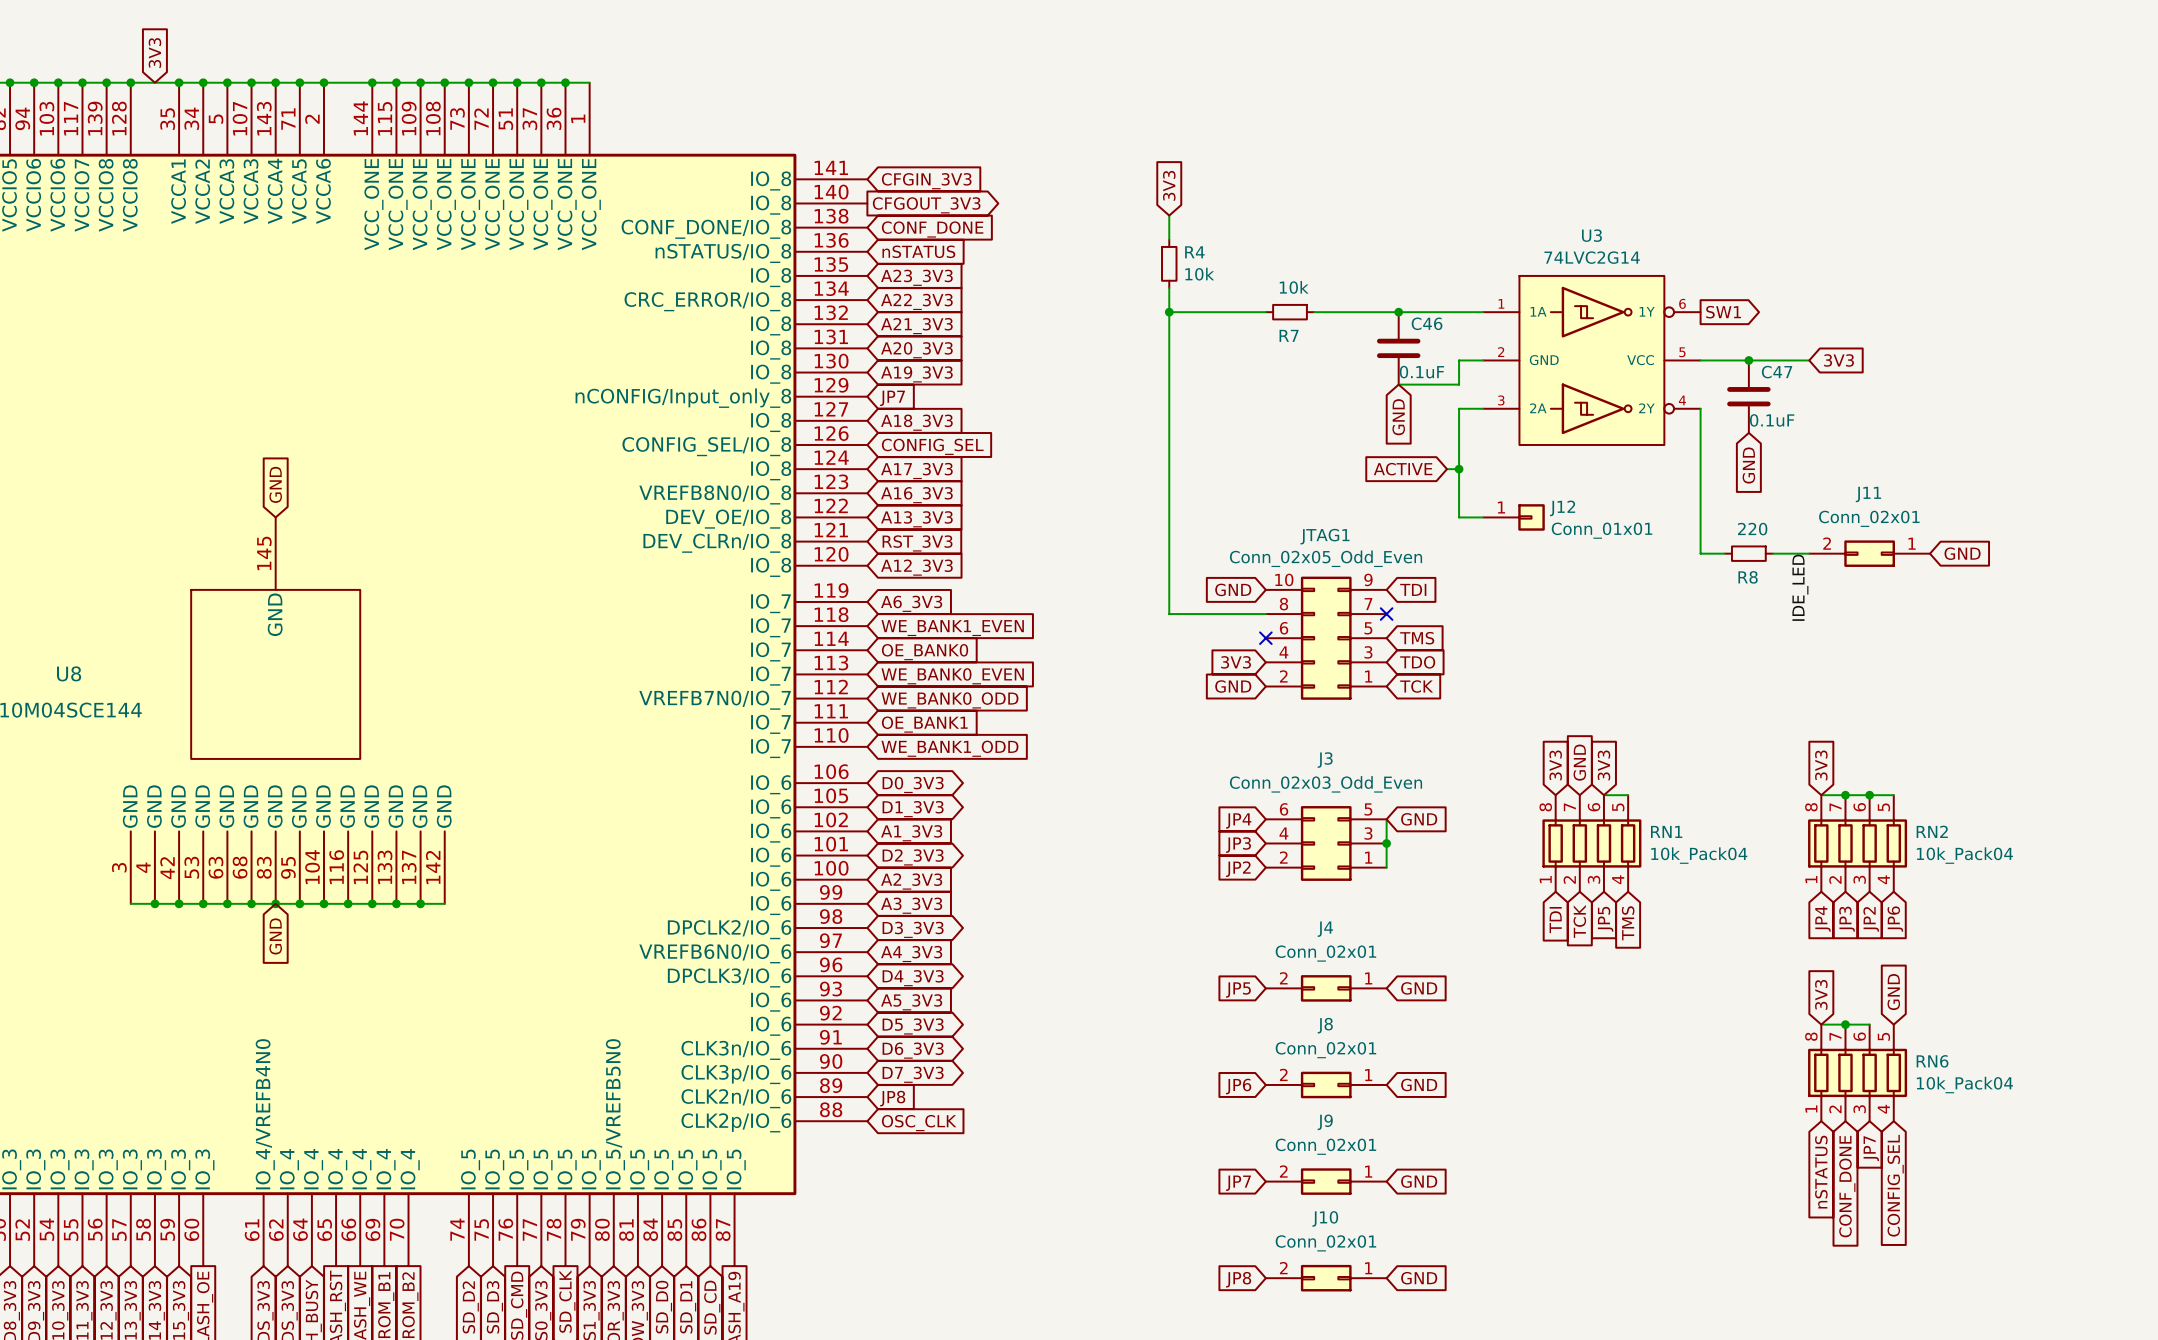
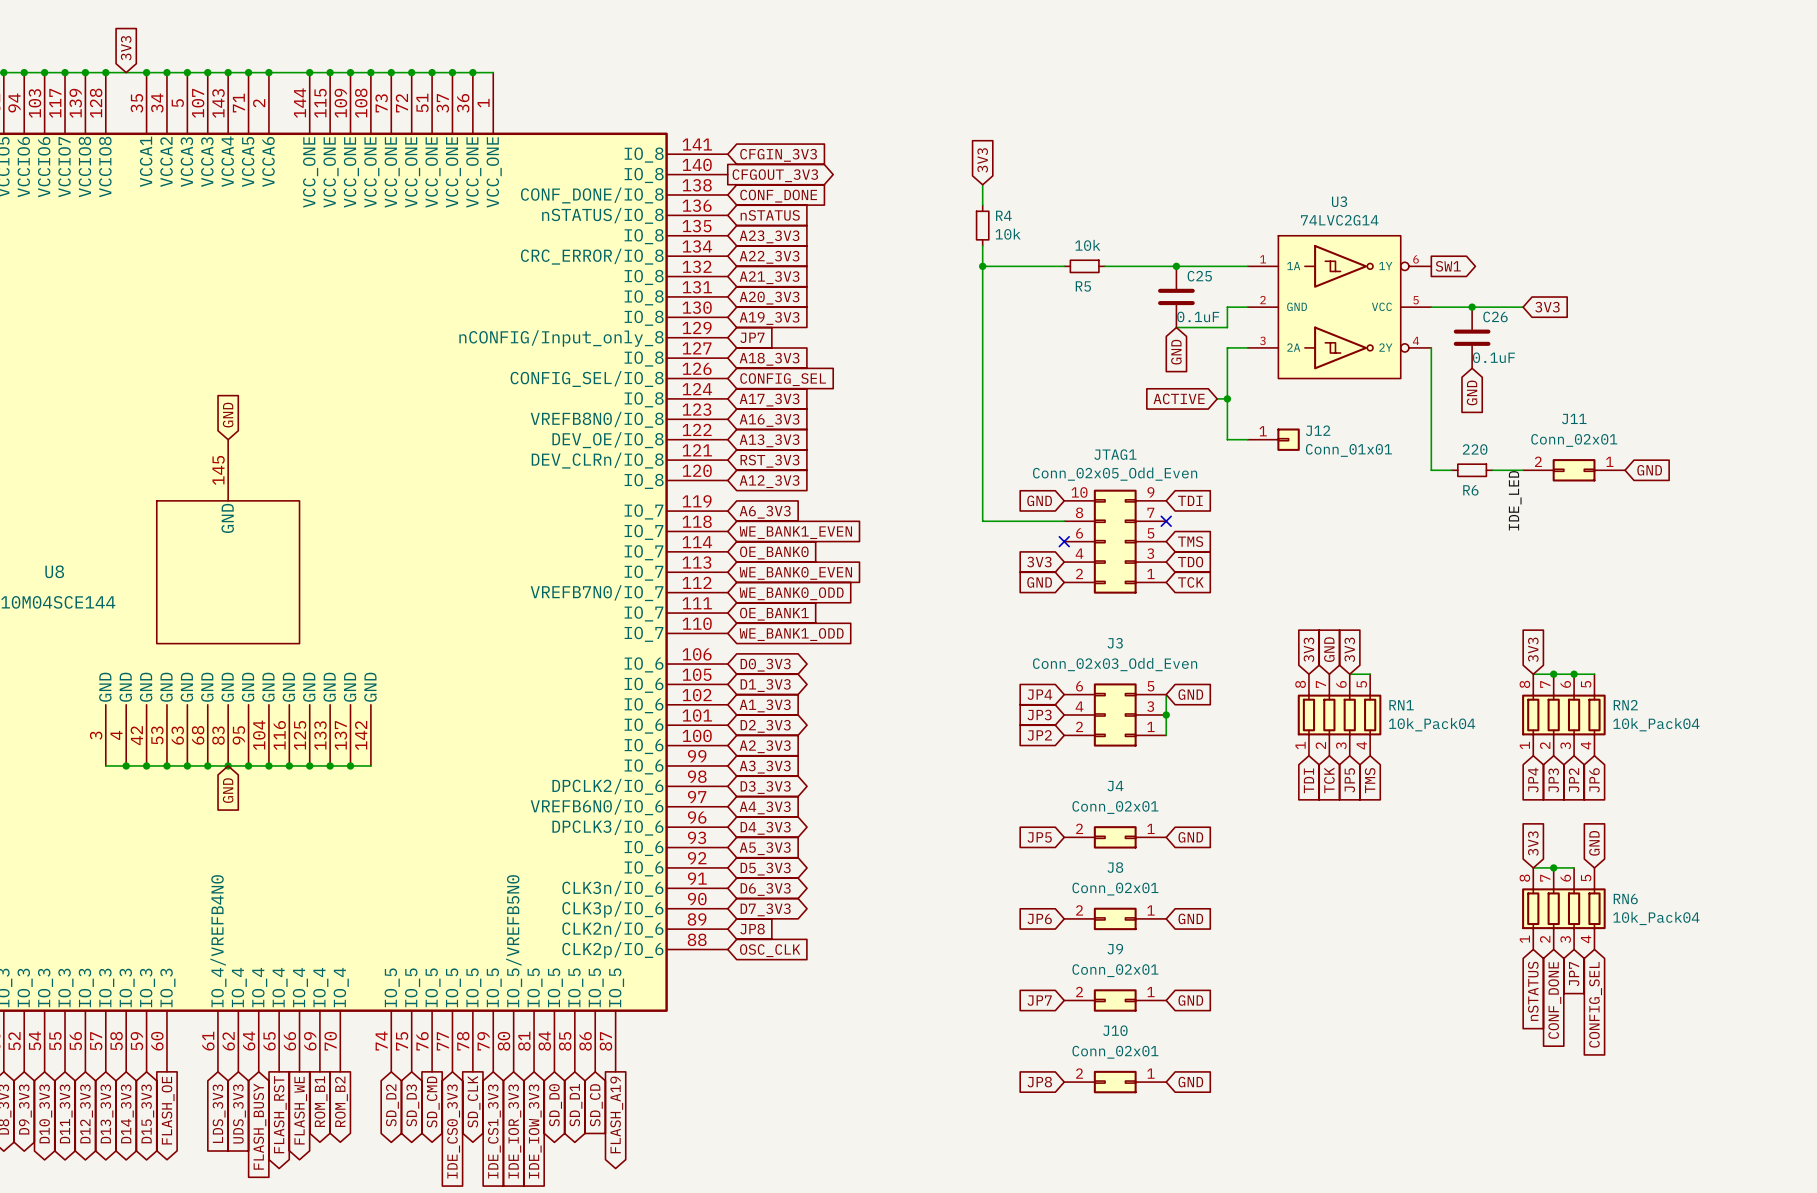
C46 name: C46 (1427, 323) -> C25 (1199, 276)
R7 name: R7 (1289, 335) -> R5 (1083, 286)
C47 name: C47 (1777, 372) -> C26 (1495, 316)
R8 name: R8 (1748, 577) -> R6 (1470, 490)

